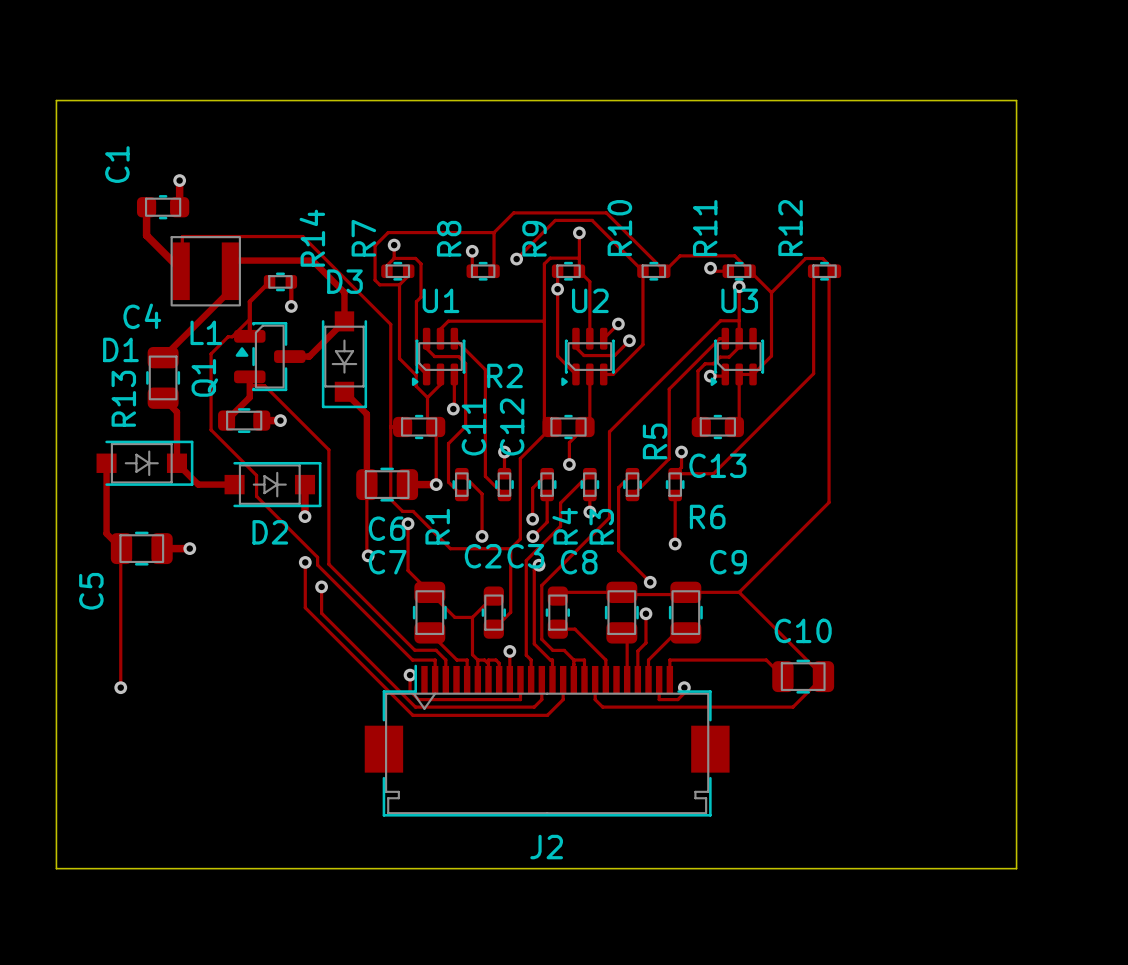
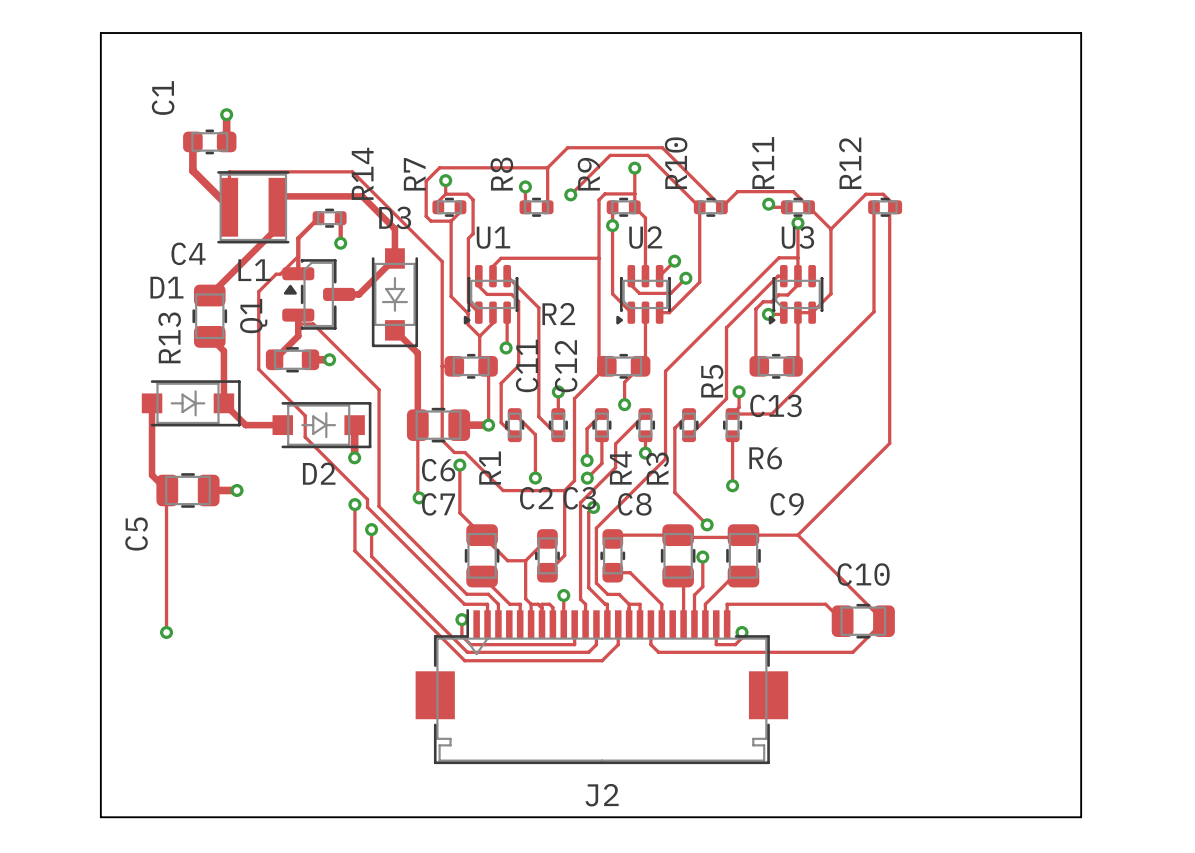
L1 footprint: [170, 236, 241, 307] -> [217, 171, 290, 244]

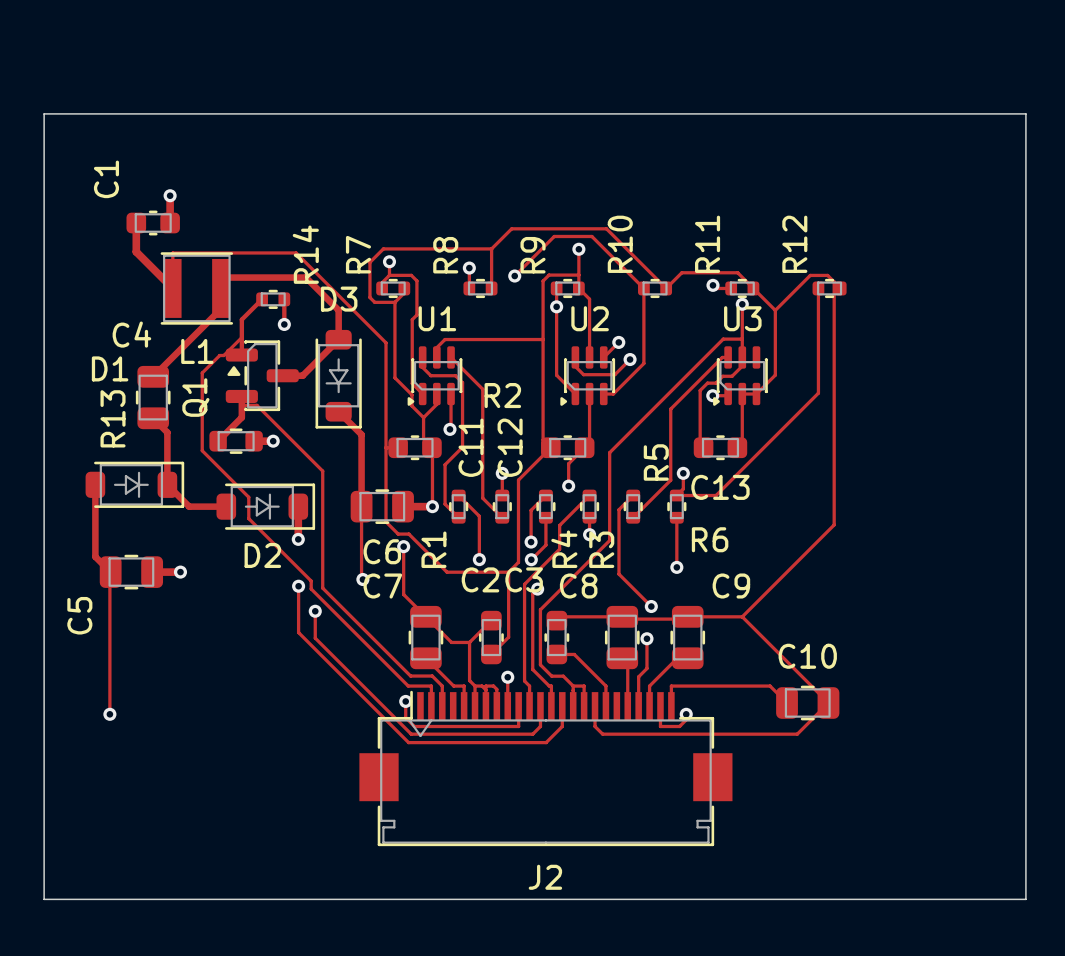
D3 footprint: [371, 248, 419, 348] -> [315, 329, 362, 429]
D1 footprint: [141, 380, 241, 427] -> [85, 461, 185, 508]
D2 footprint: [272, 402, 372, 449] -> [216, 483, 316, 530]

